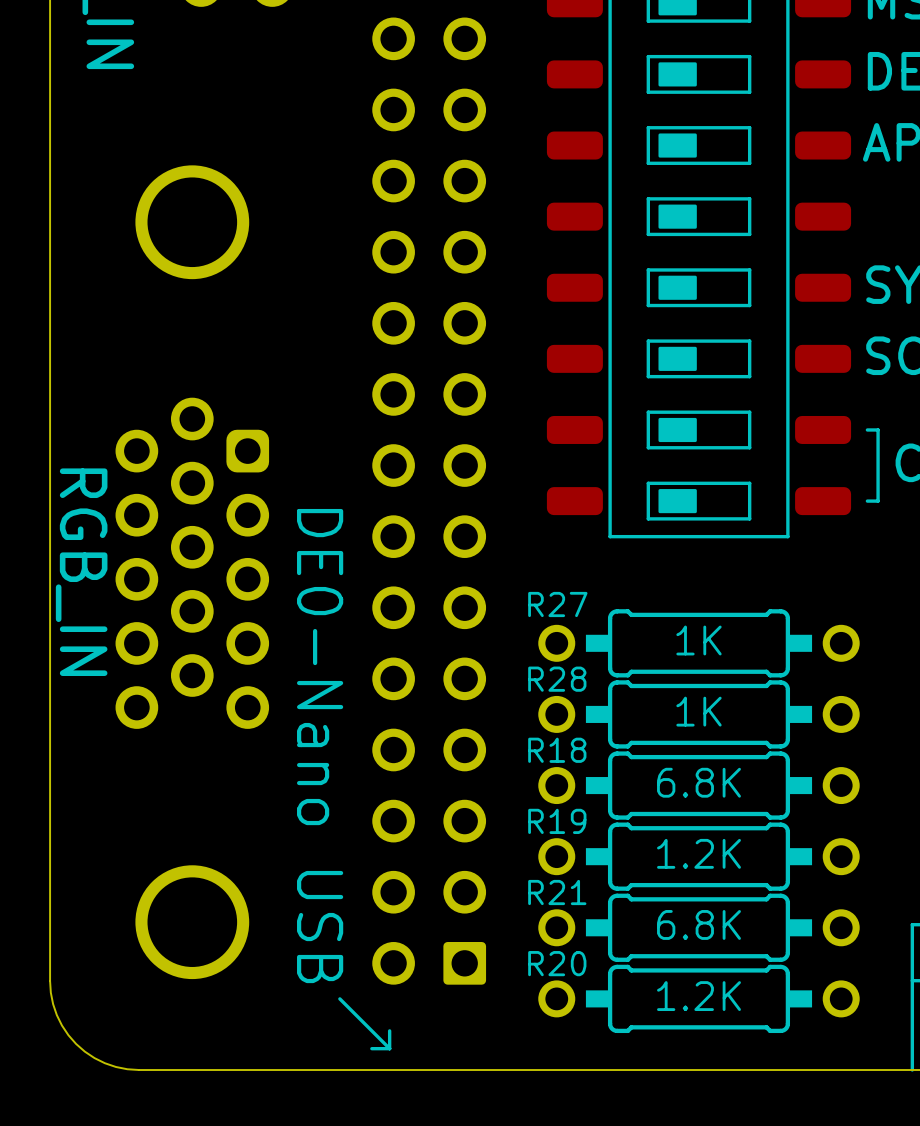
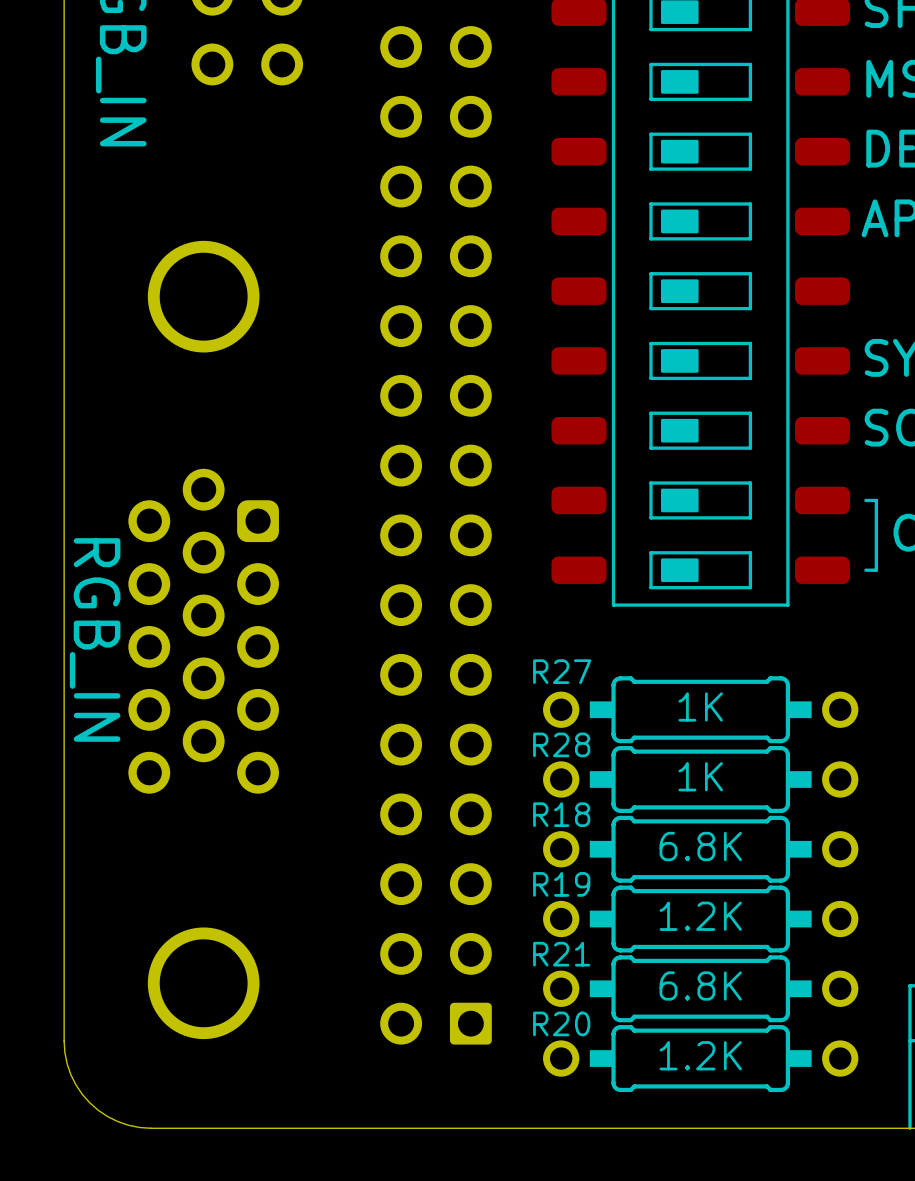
text: DE0-Nano USB (320, 746) -> none
line: (339, 998) (389, 1048) -> none
line: (389, 1030) (389, 1048) -> none
line: (371, 1048) (389, 1048) -> none

